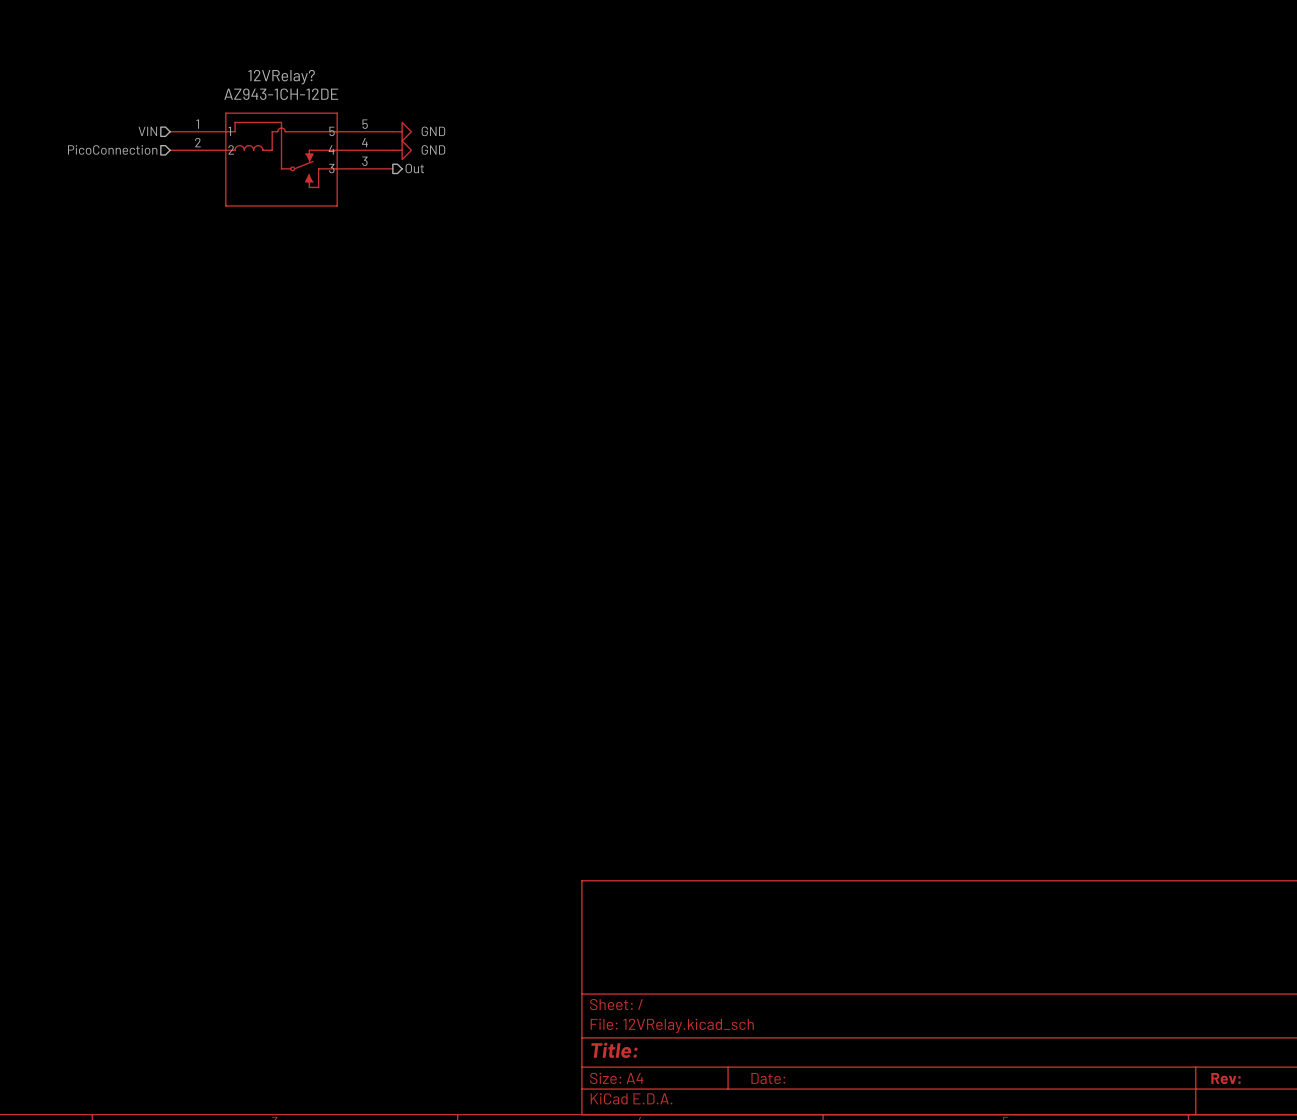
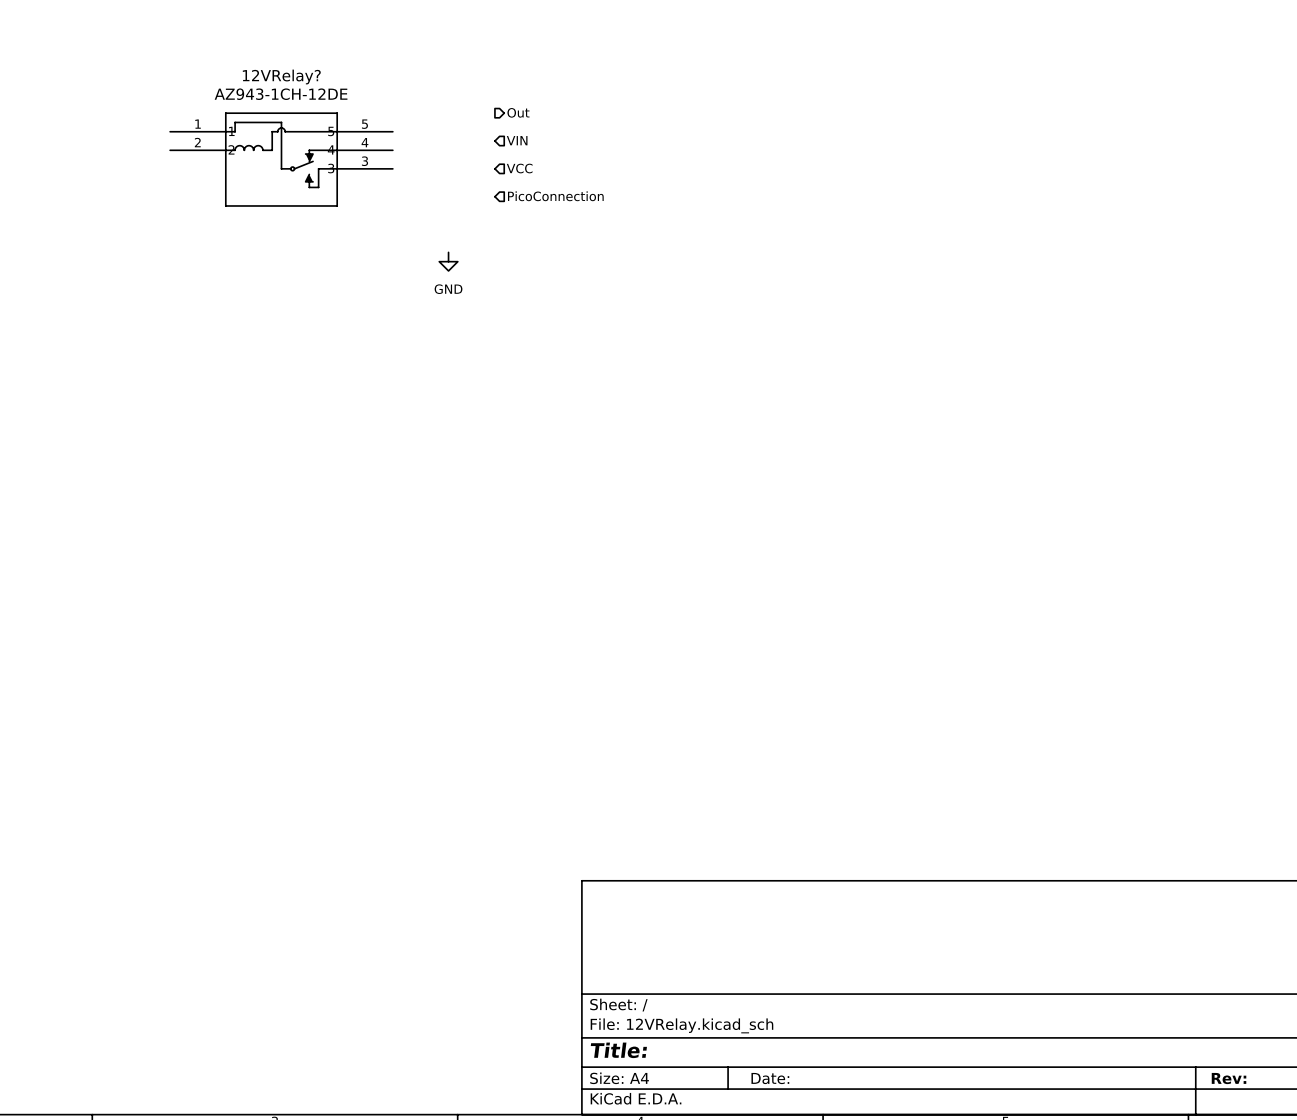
hierarchical label: VIN (147, 131) -> none
power symbol: GND (402, 131) -> none
hierarchical label: none -> VIN (517, 140)
hierarchical label: PicoConnection (112, 149) -> none
power symbol: GND (402, 150) -> none
hierarchical label position: Out (414, 168) -> Out (518, 112)
hierarchical label: none -> VCC (519, 168)
hierarchical label: none -> PicoConnection (555, 196)
power symbol: none -> GND (448, 261)

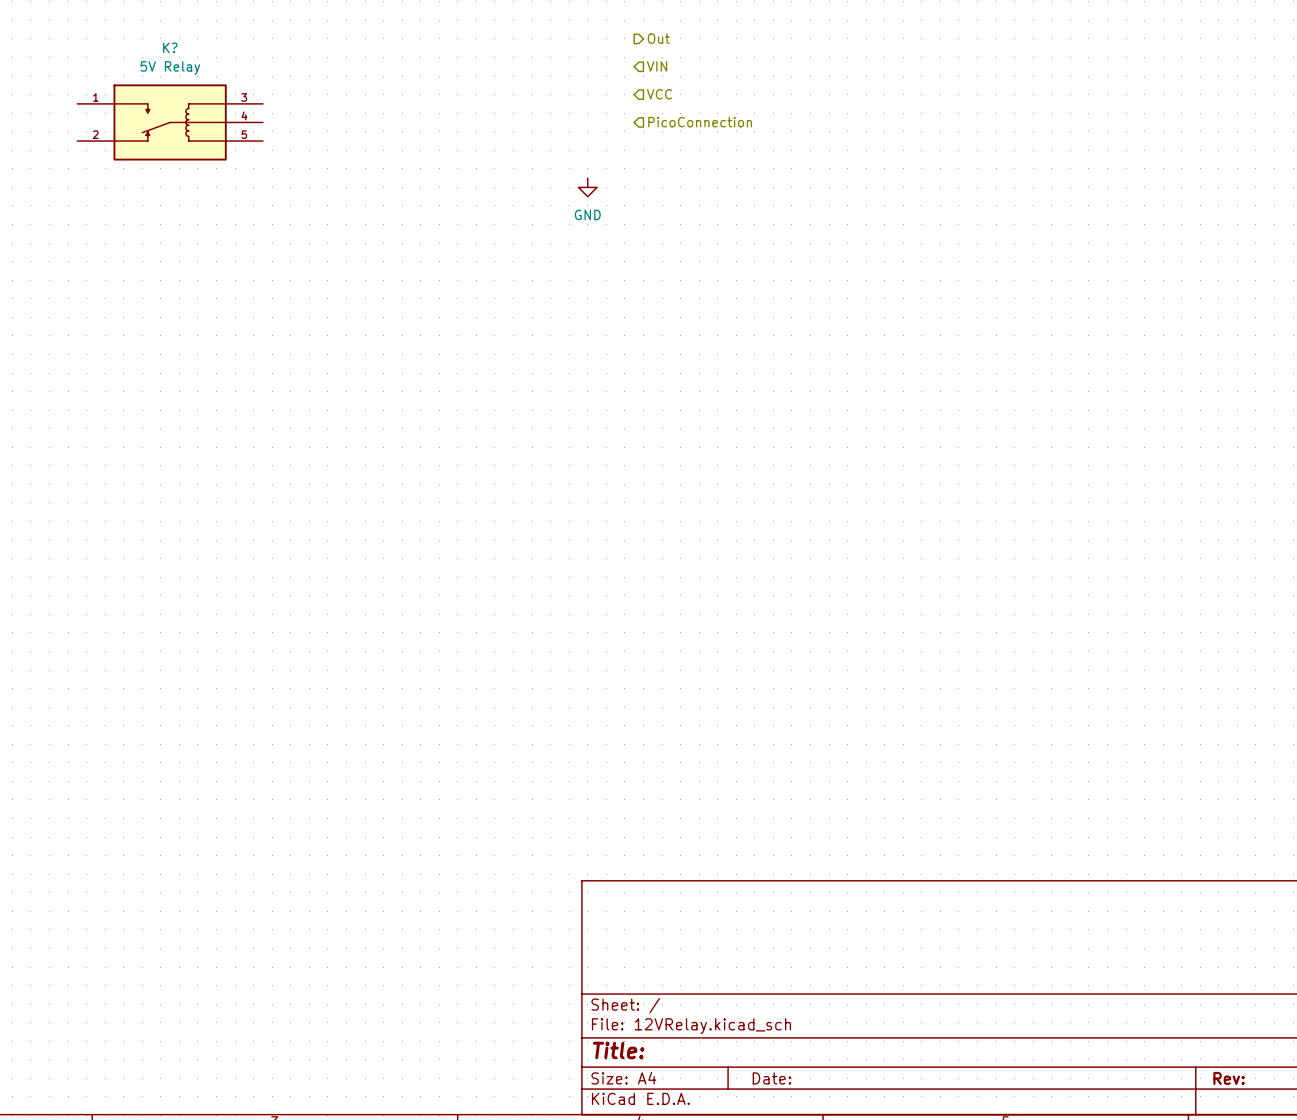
hierarchical label position: Out (518, 112) -> Out (658, 38)
K?: none -> 5V Relay (170, 122)
hierarchical label position: VIN (517, 140) -> VIN (657, 66)
12VRelay?: AZ943-1CH-12DE (281, 159) -> none
hierarchical label position: VCC (519, 168) -> VCC (659, 94)
hierarchical label position: PicoConnection (555, 196) -> PicoConnection (700, 122)
power symbol position: GND (448, 261) -> GND (587, 187)

